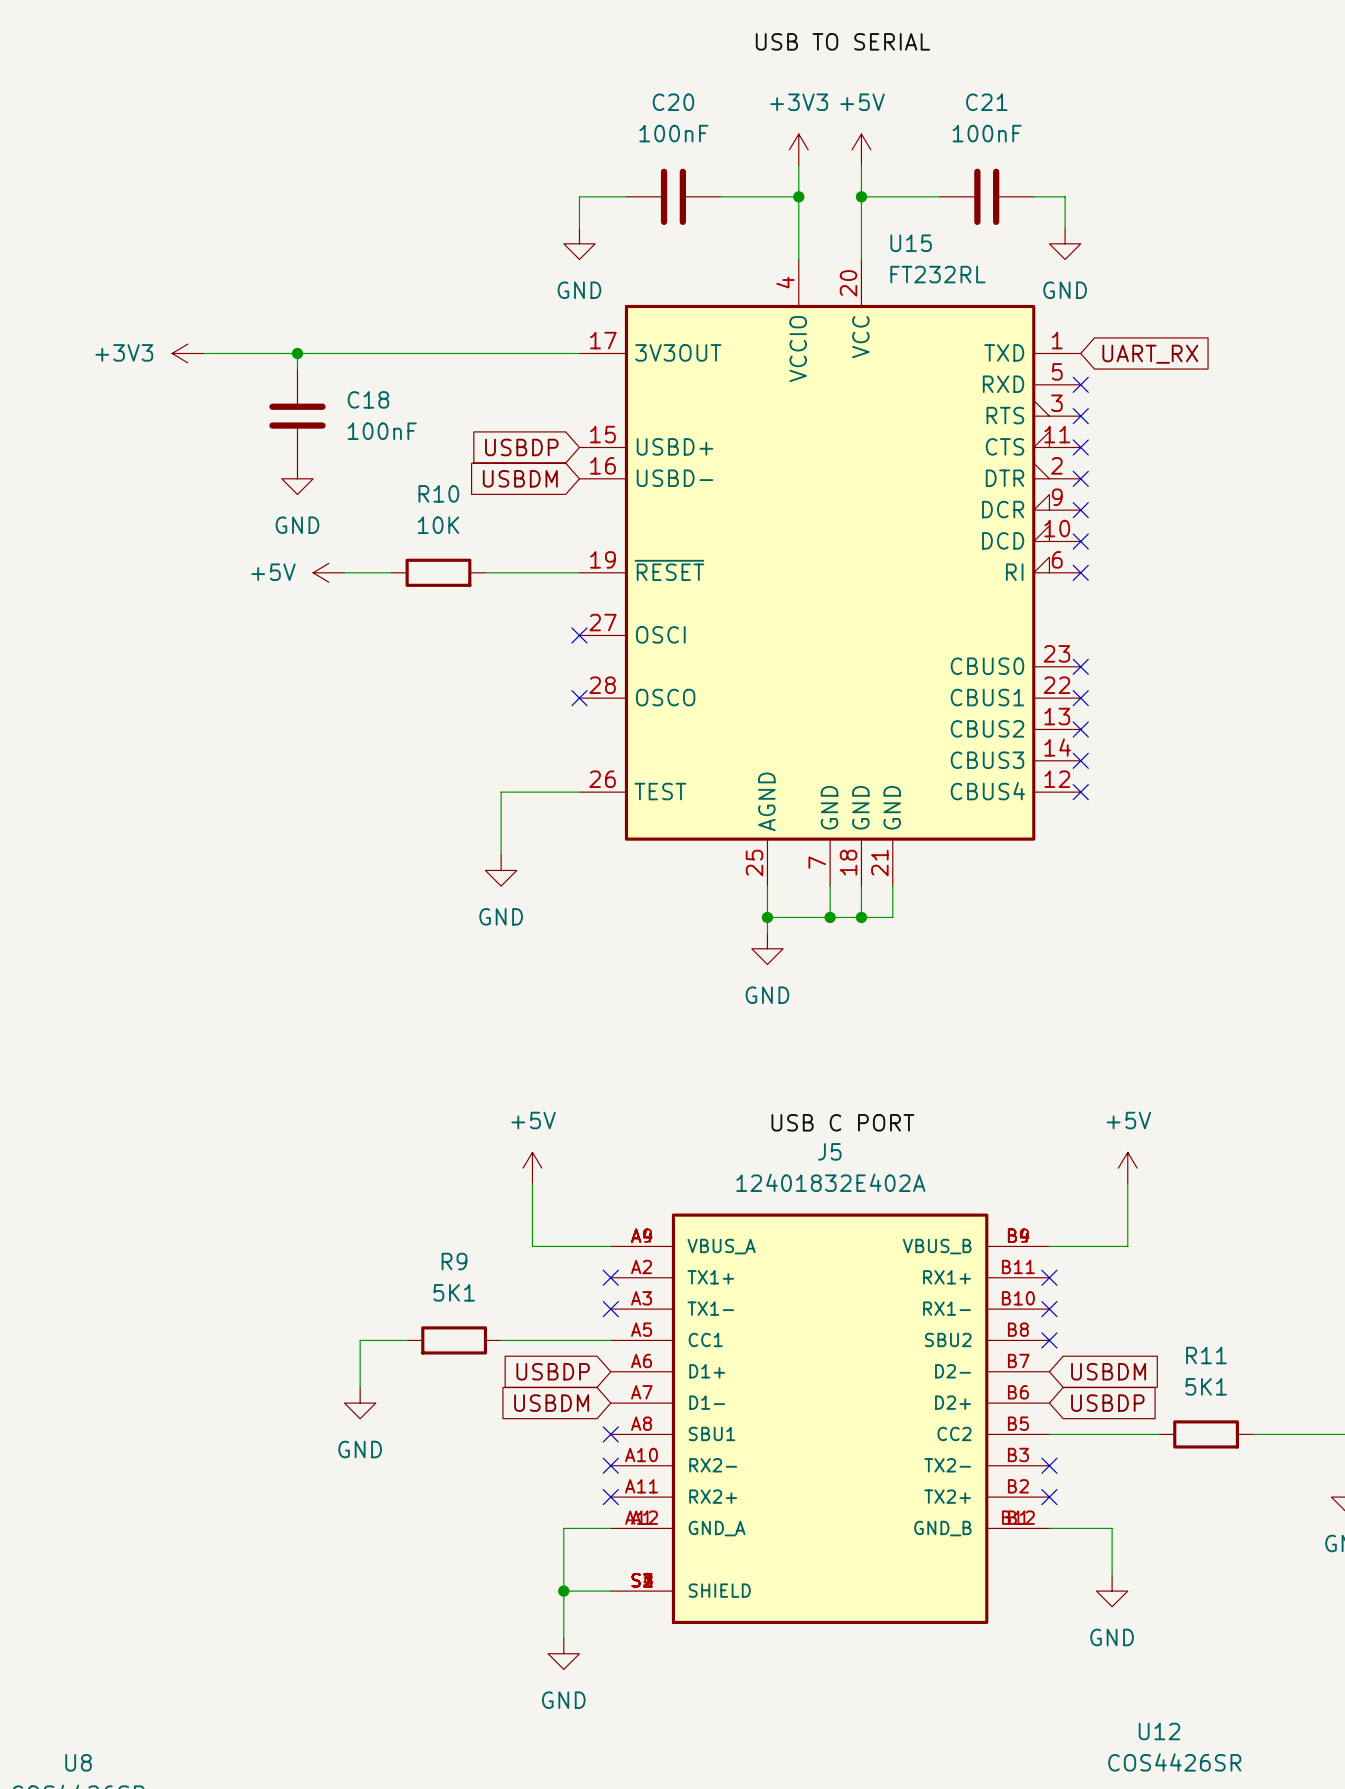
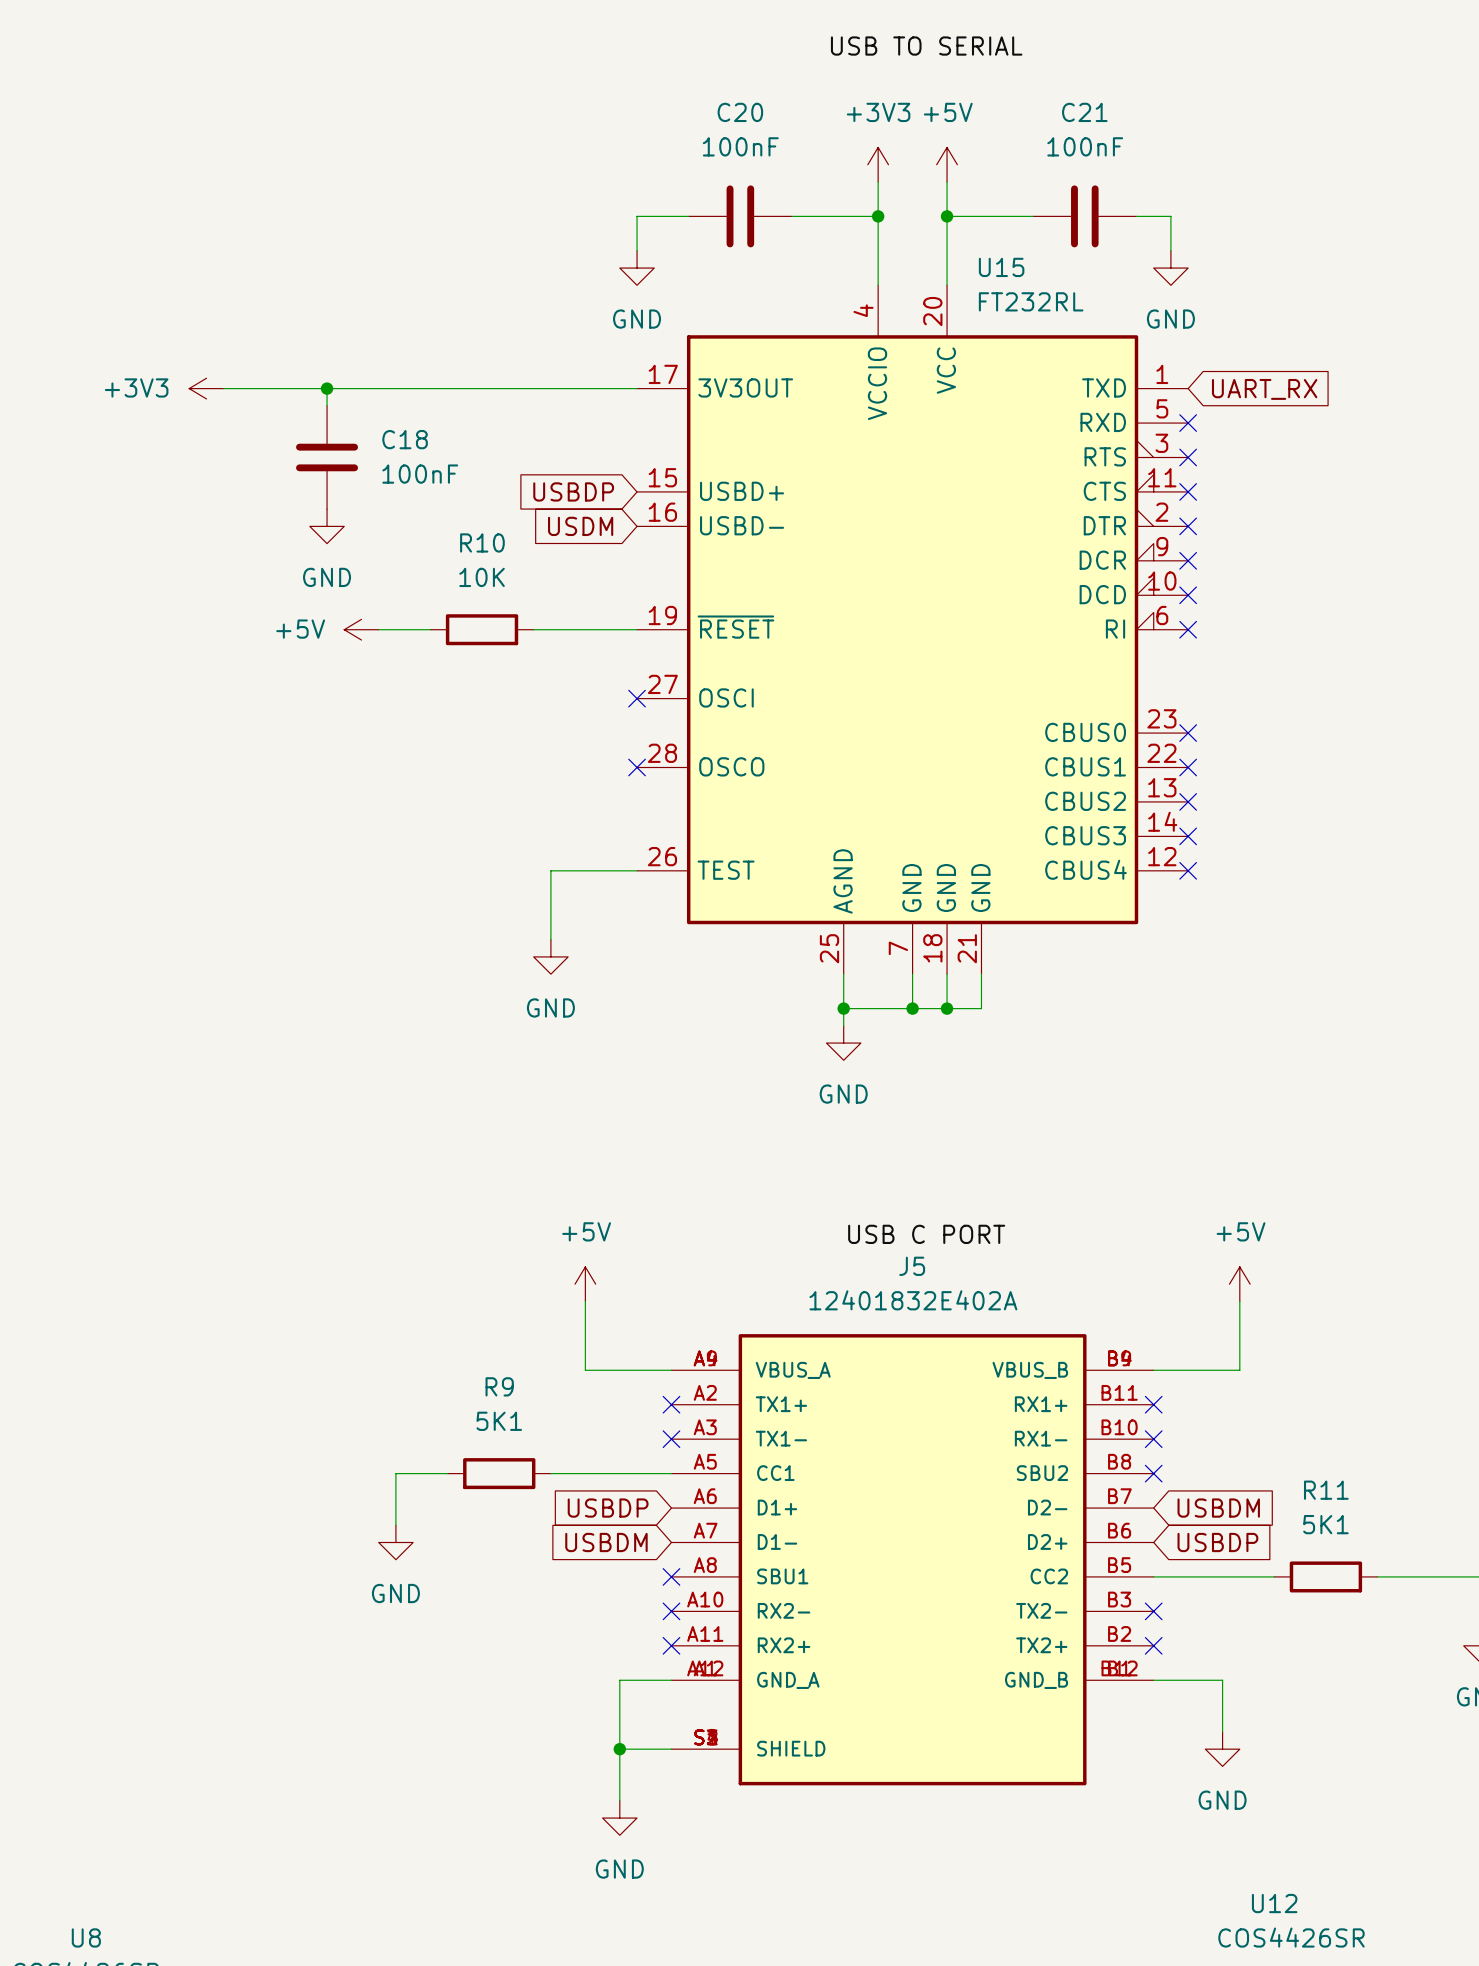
global label: USBDM (520, 478) -> USDM (580, 526)

